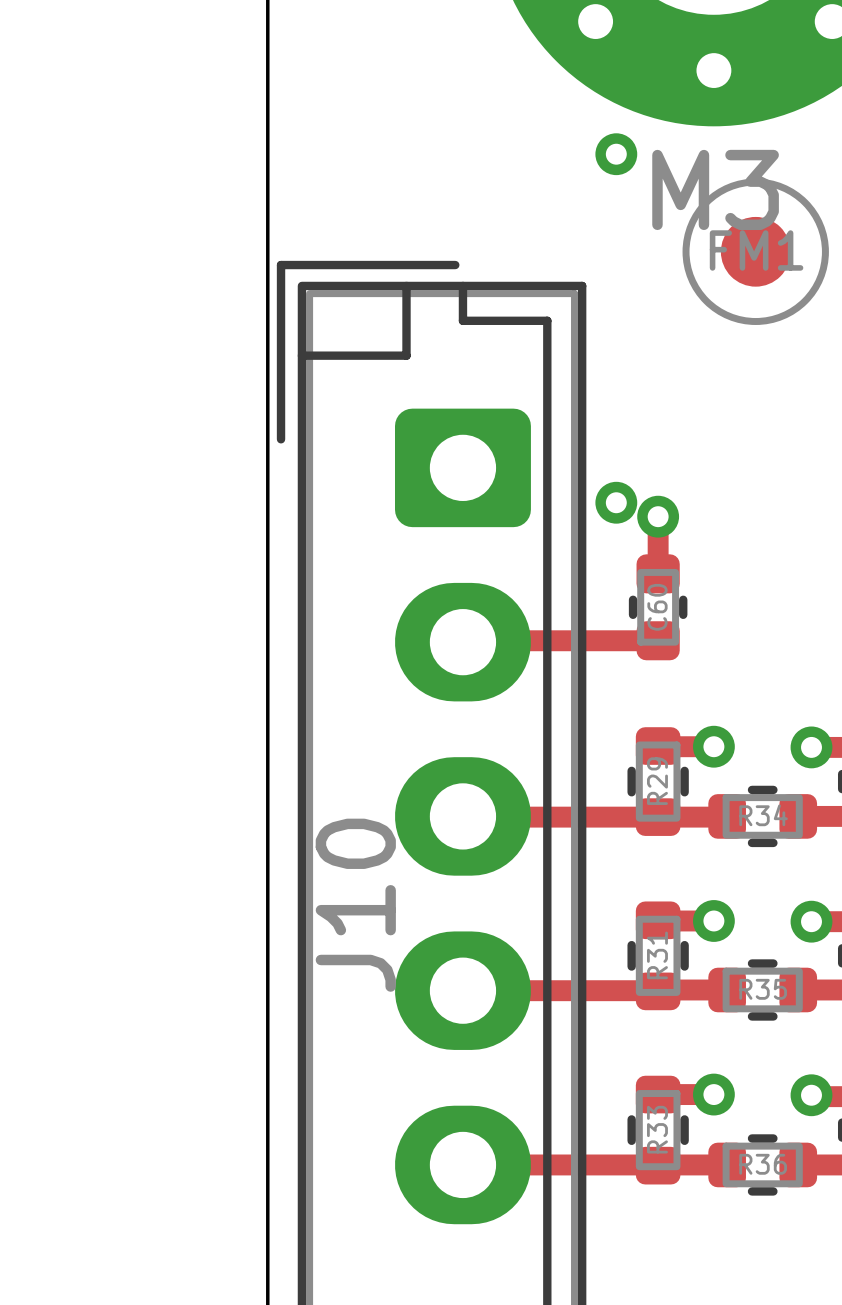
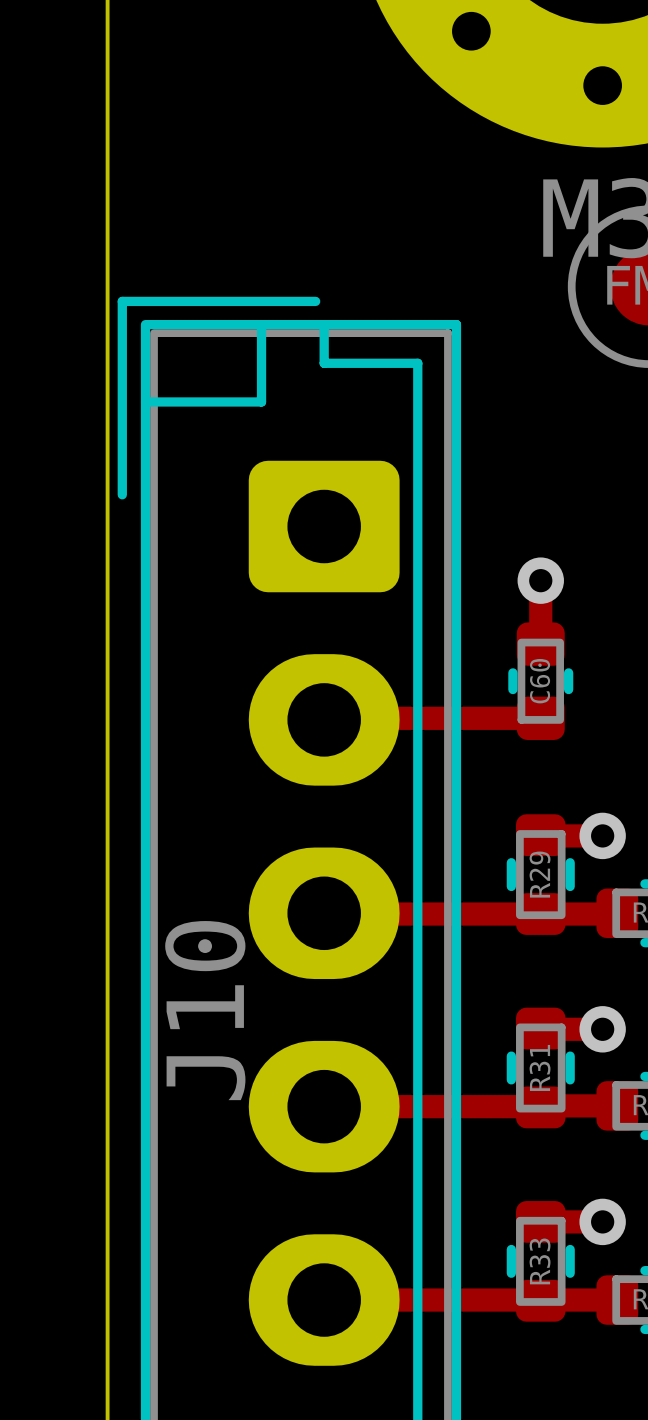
via: (616, 154) -> none
via: (616, 502) -> none

